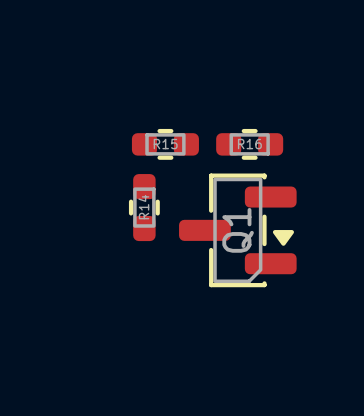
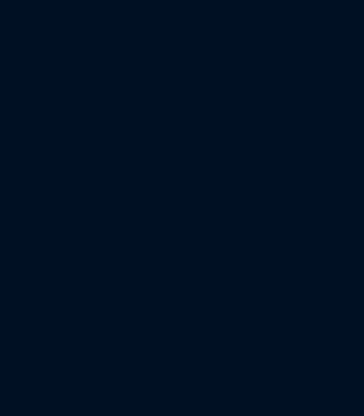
R15: (165, 144) -> none
R16: (249, 144) -> none
R14: (144, 207) -> none
Q1: (237, 230) -> none

